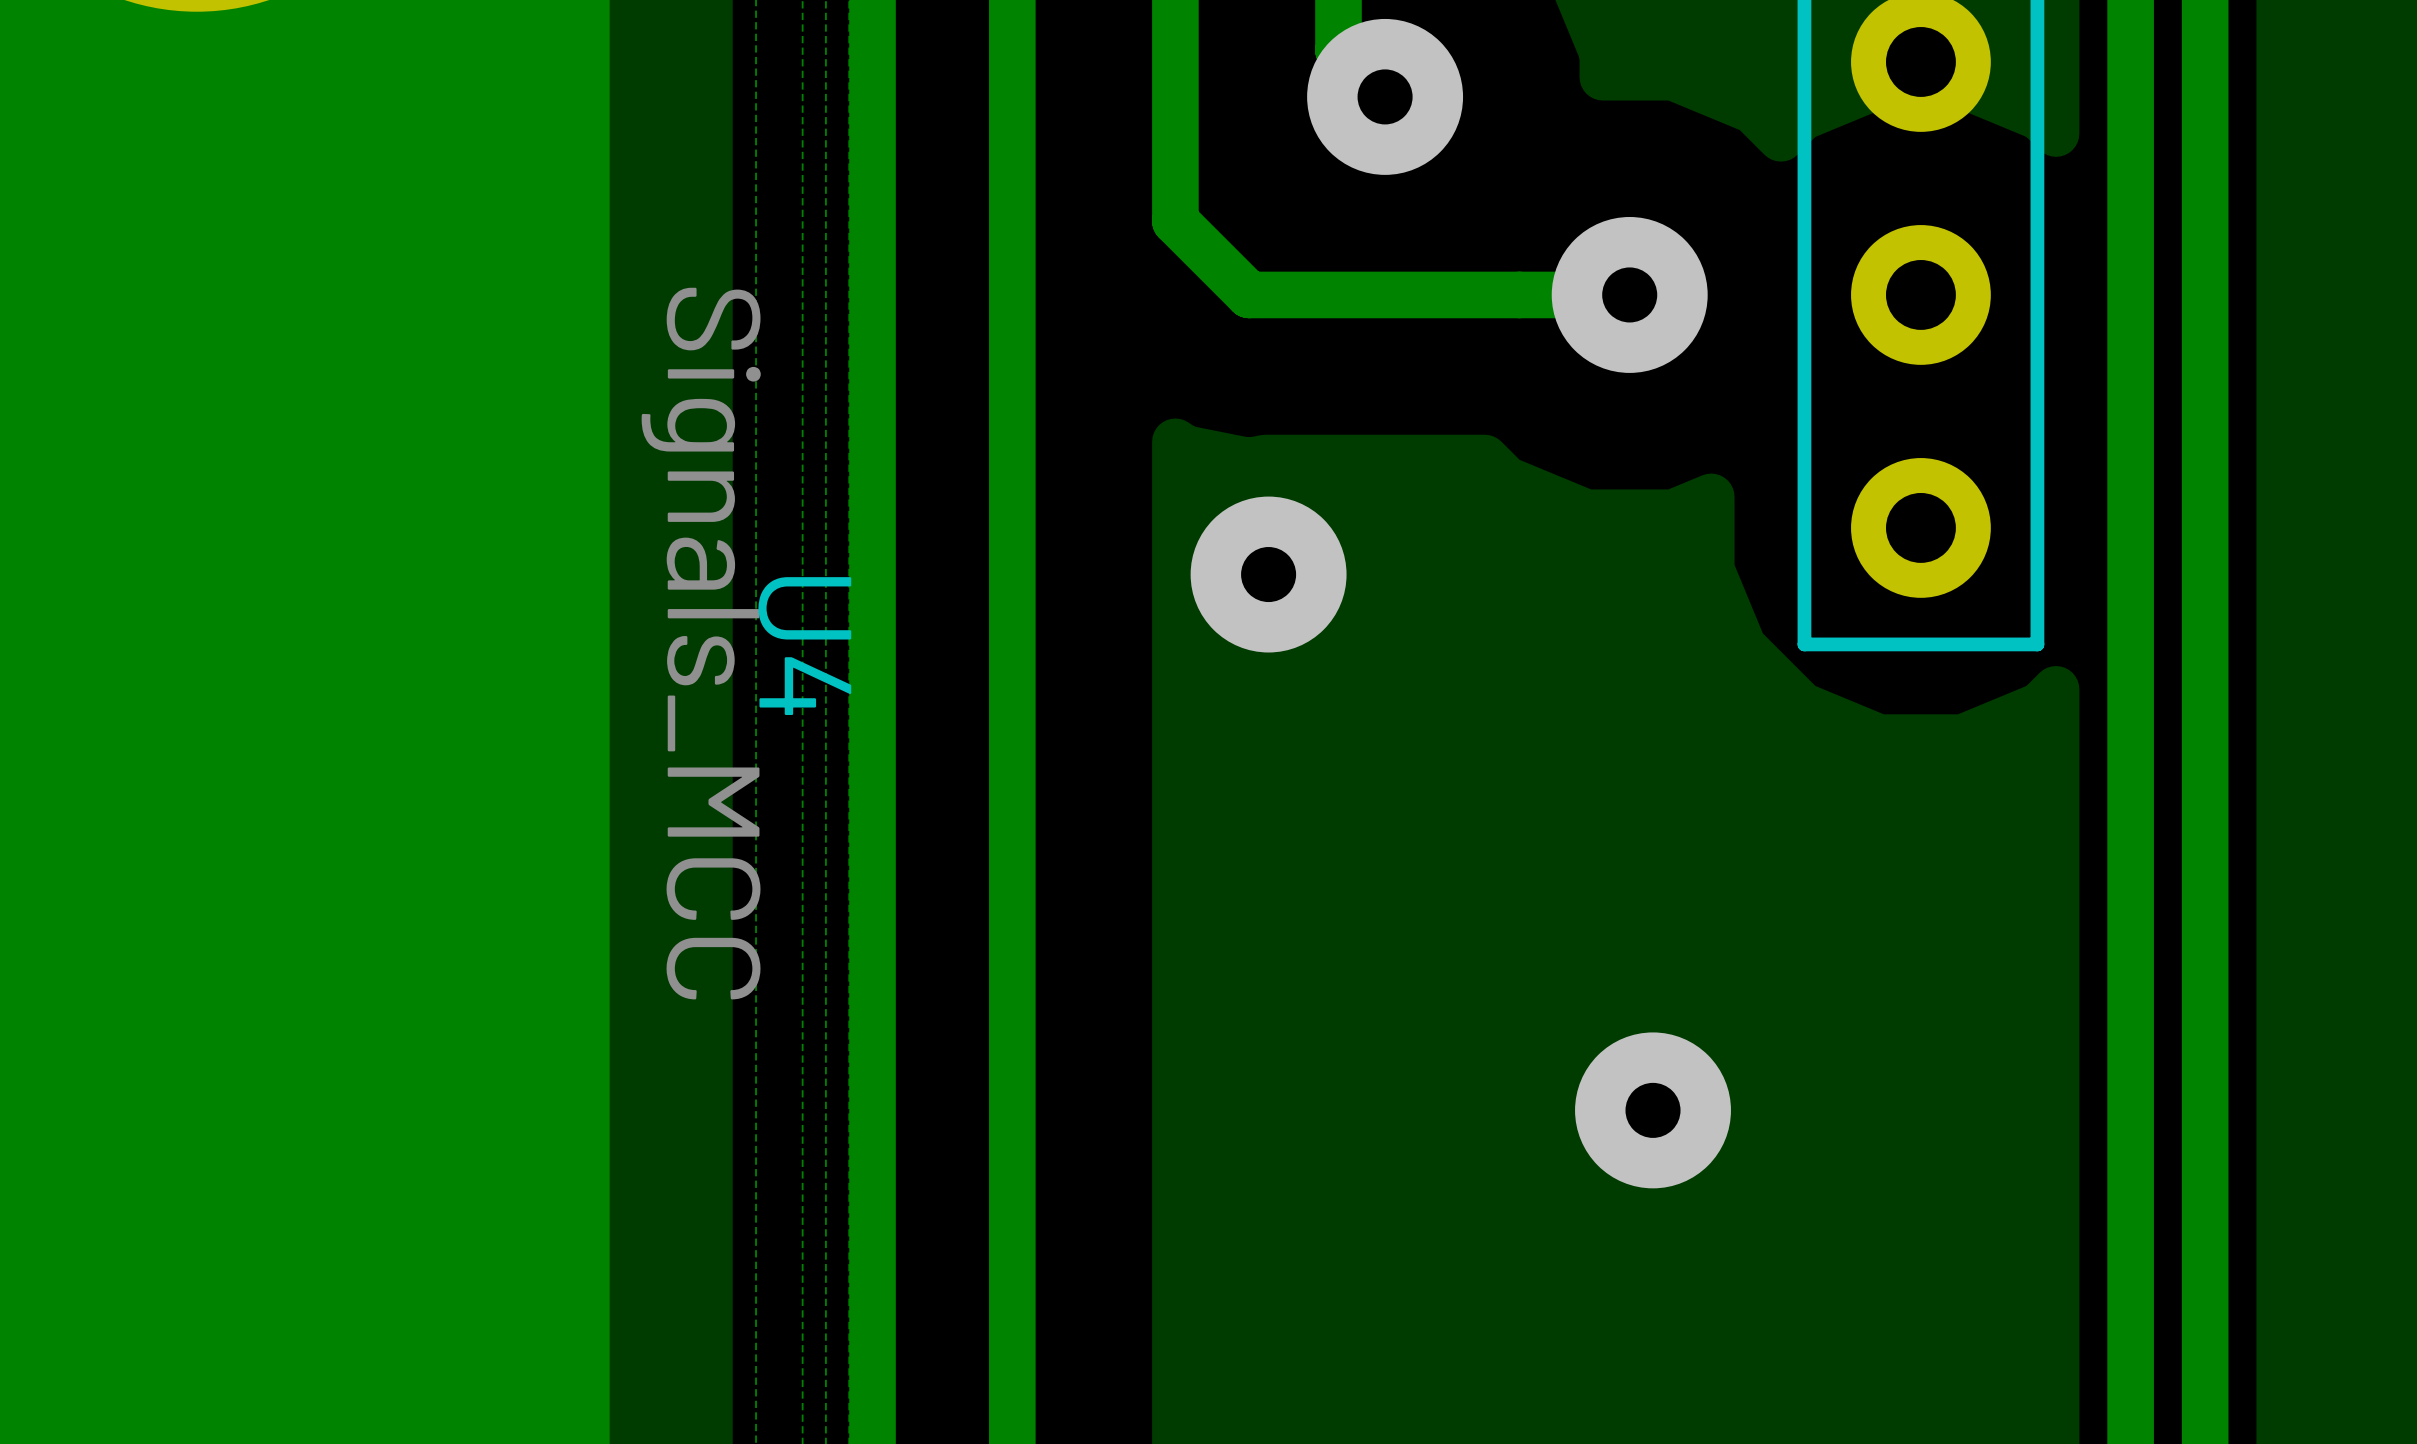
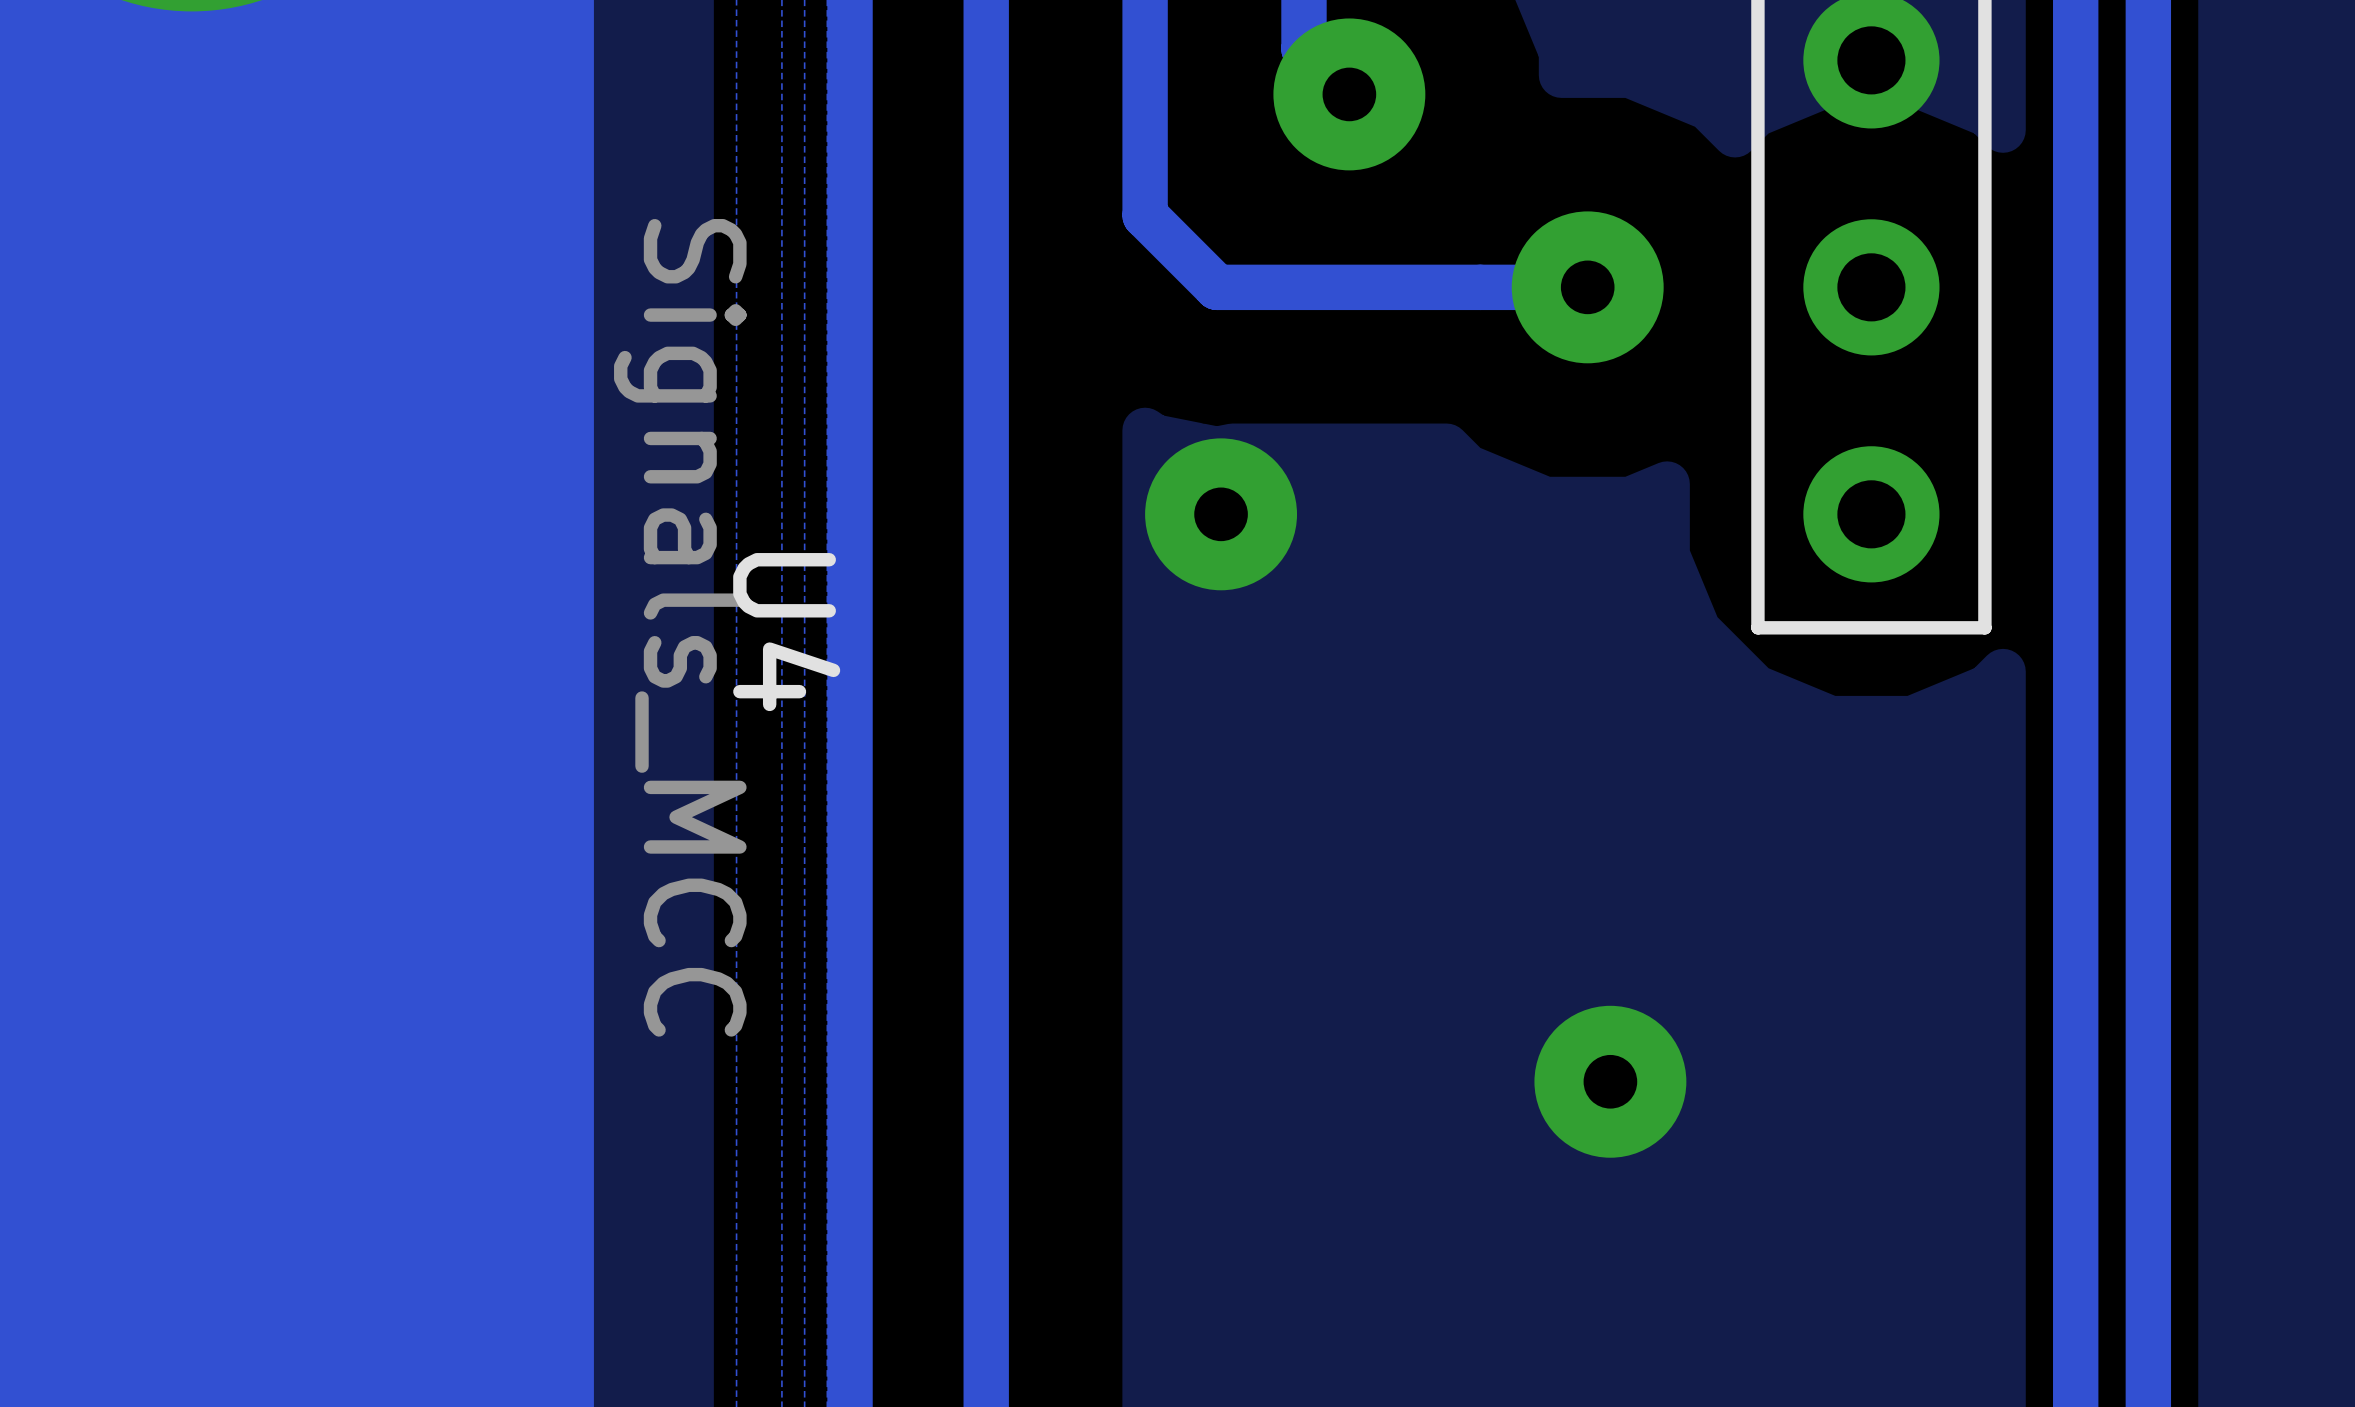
via position: (1268, 574) -> (1221, 514)

